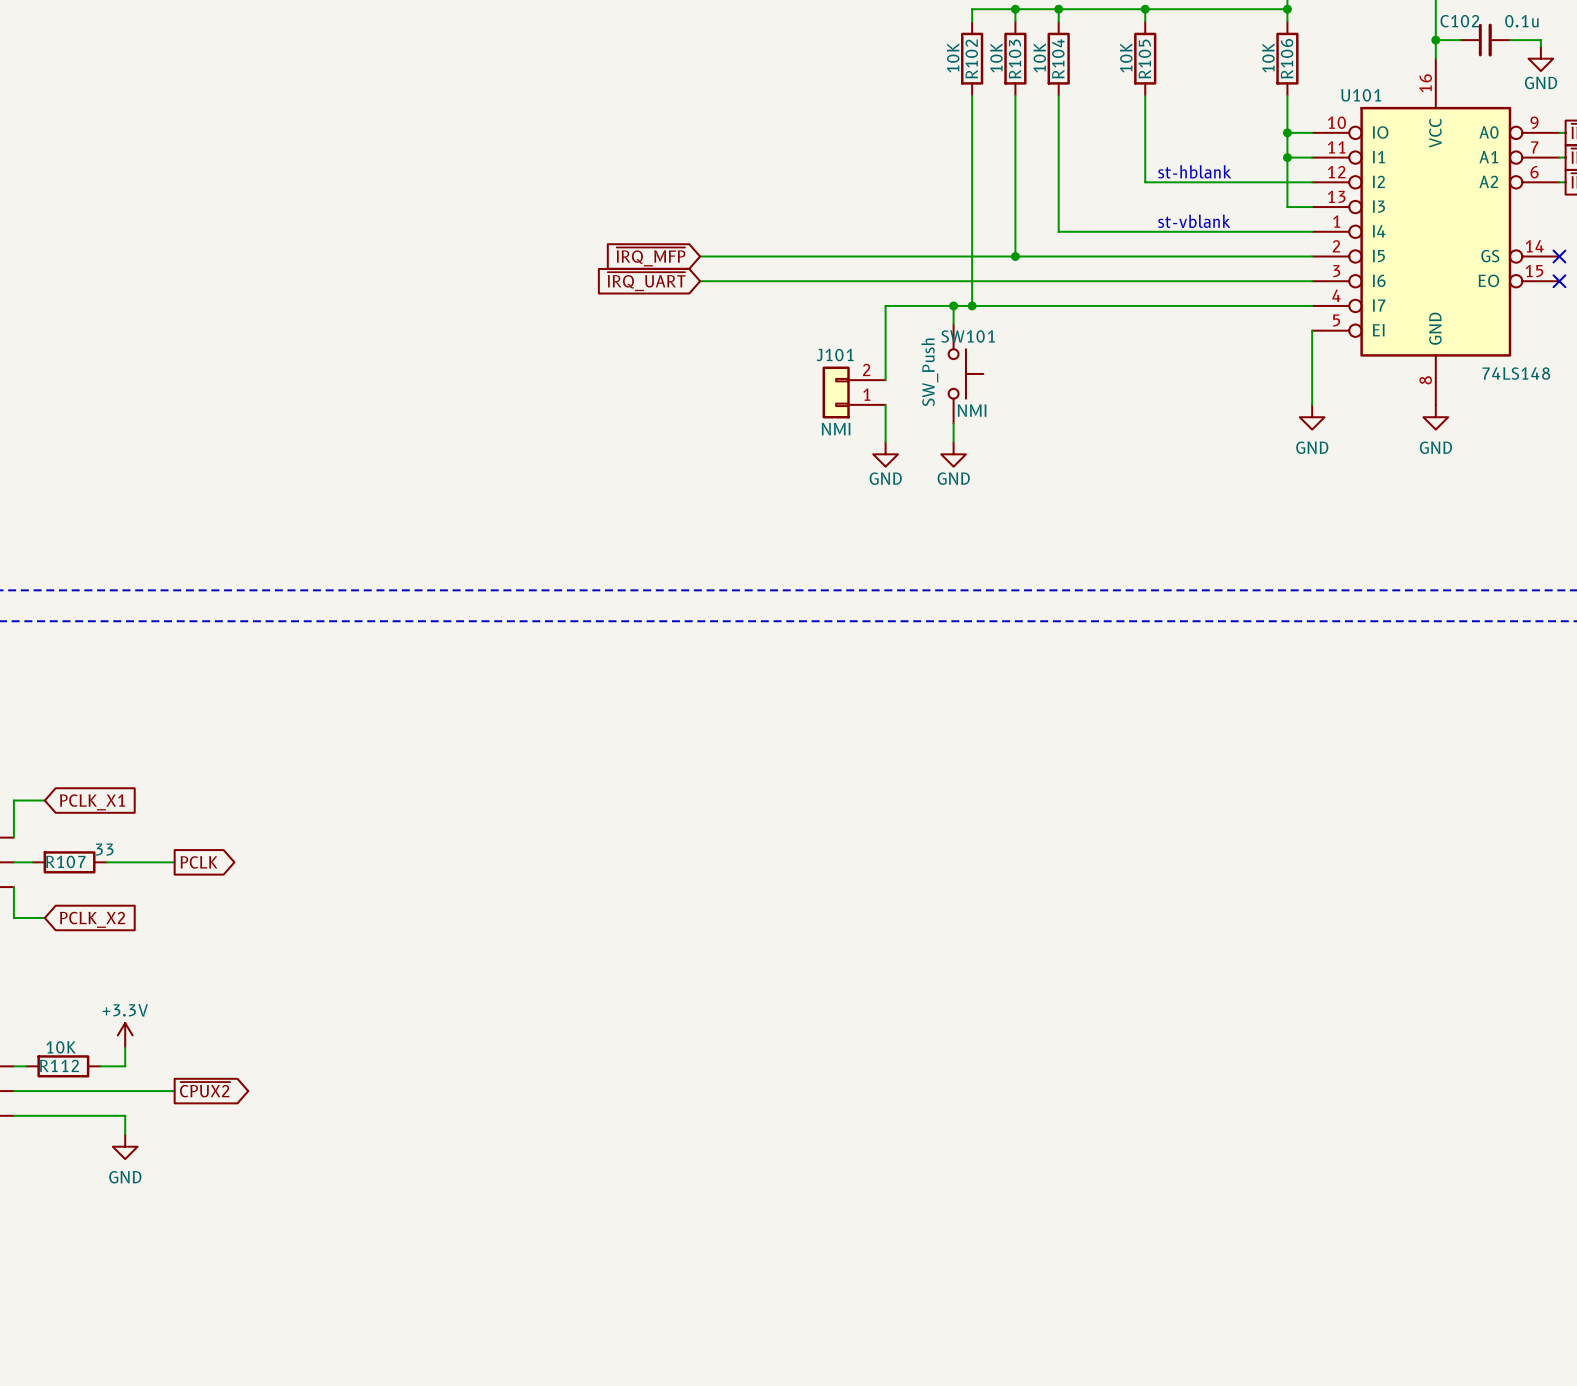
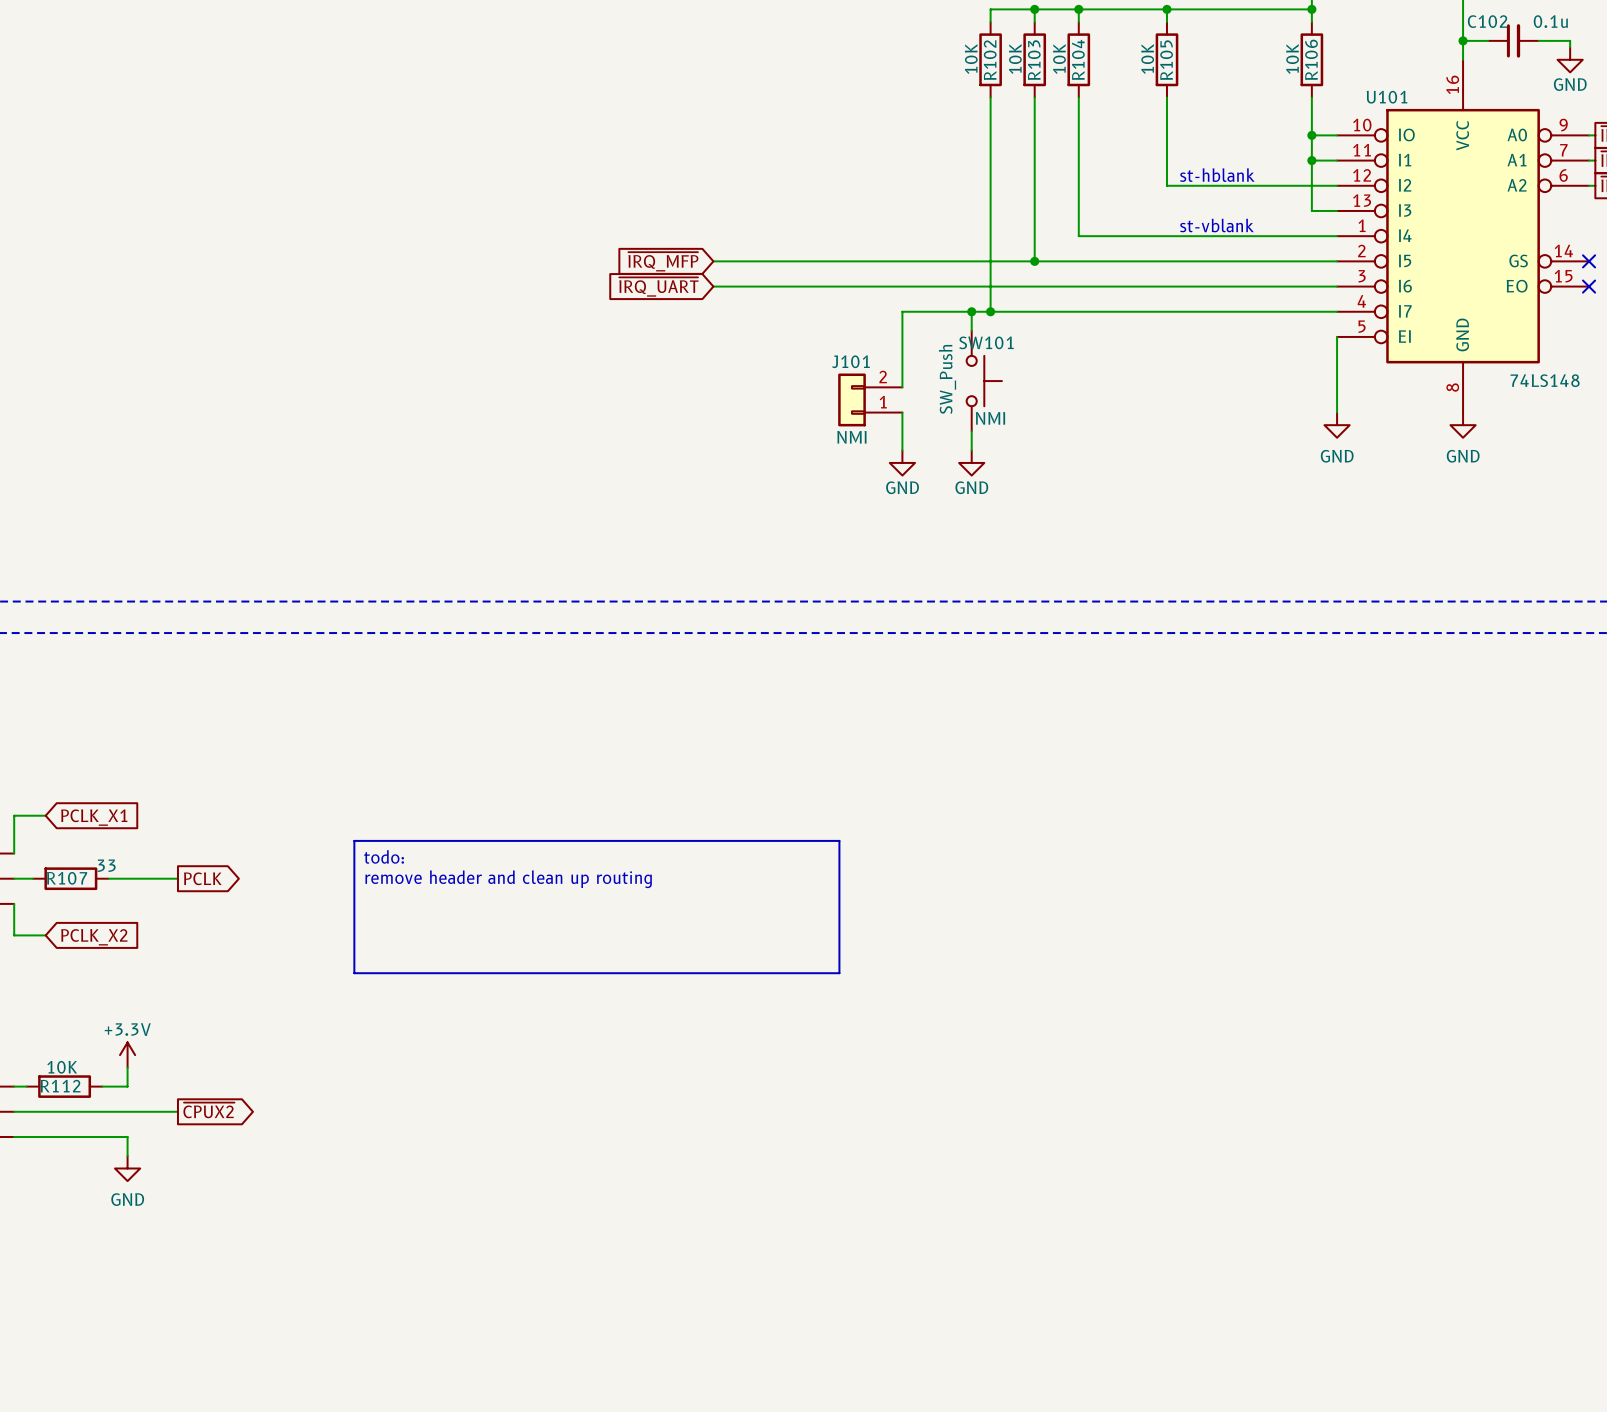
line: none -> (354, 840) (839, 840) (839, 973) (354, 973) (354, 840)
text: none -> todo: (384, 856)
text: none -> remove header and clean up routing (508, 879)

